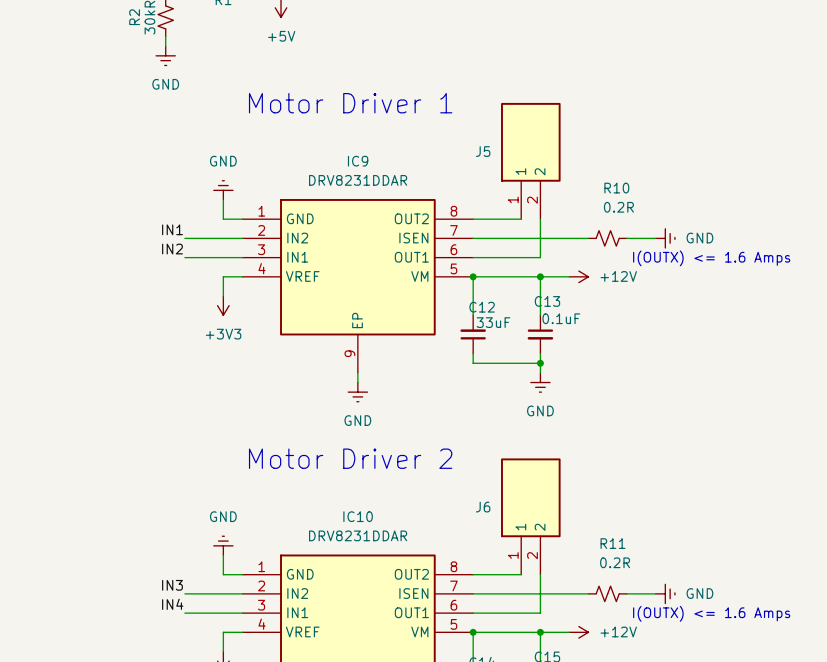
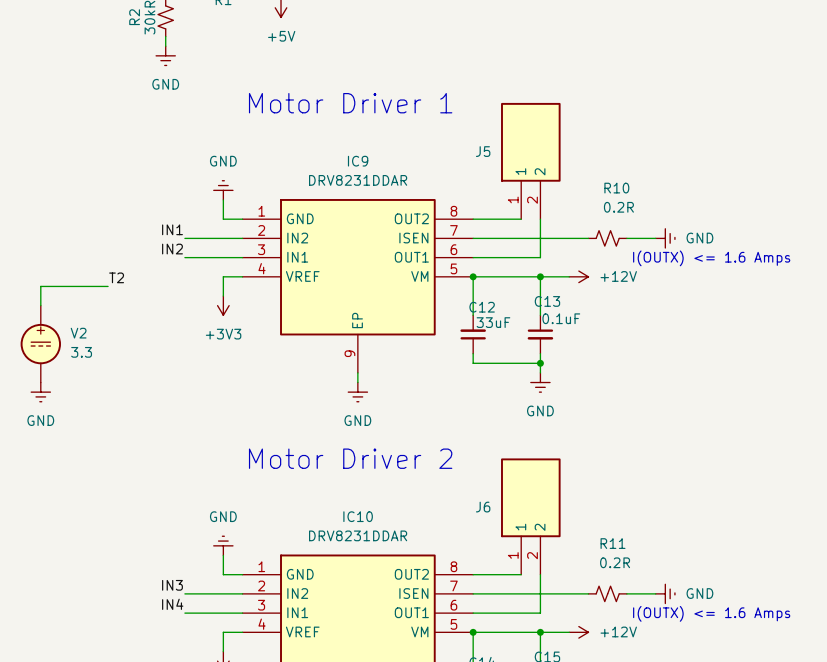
label: none -> T2 (116, 277)
wire: none -> (108, 286) (40, 286) (40, 305)
V2: none -> 3.3 (40, 344)
power symbol: none -> GND (40, 392)

